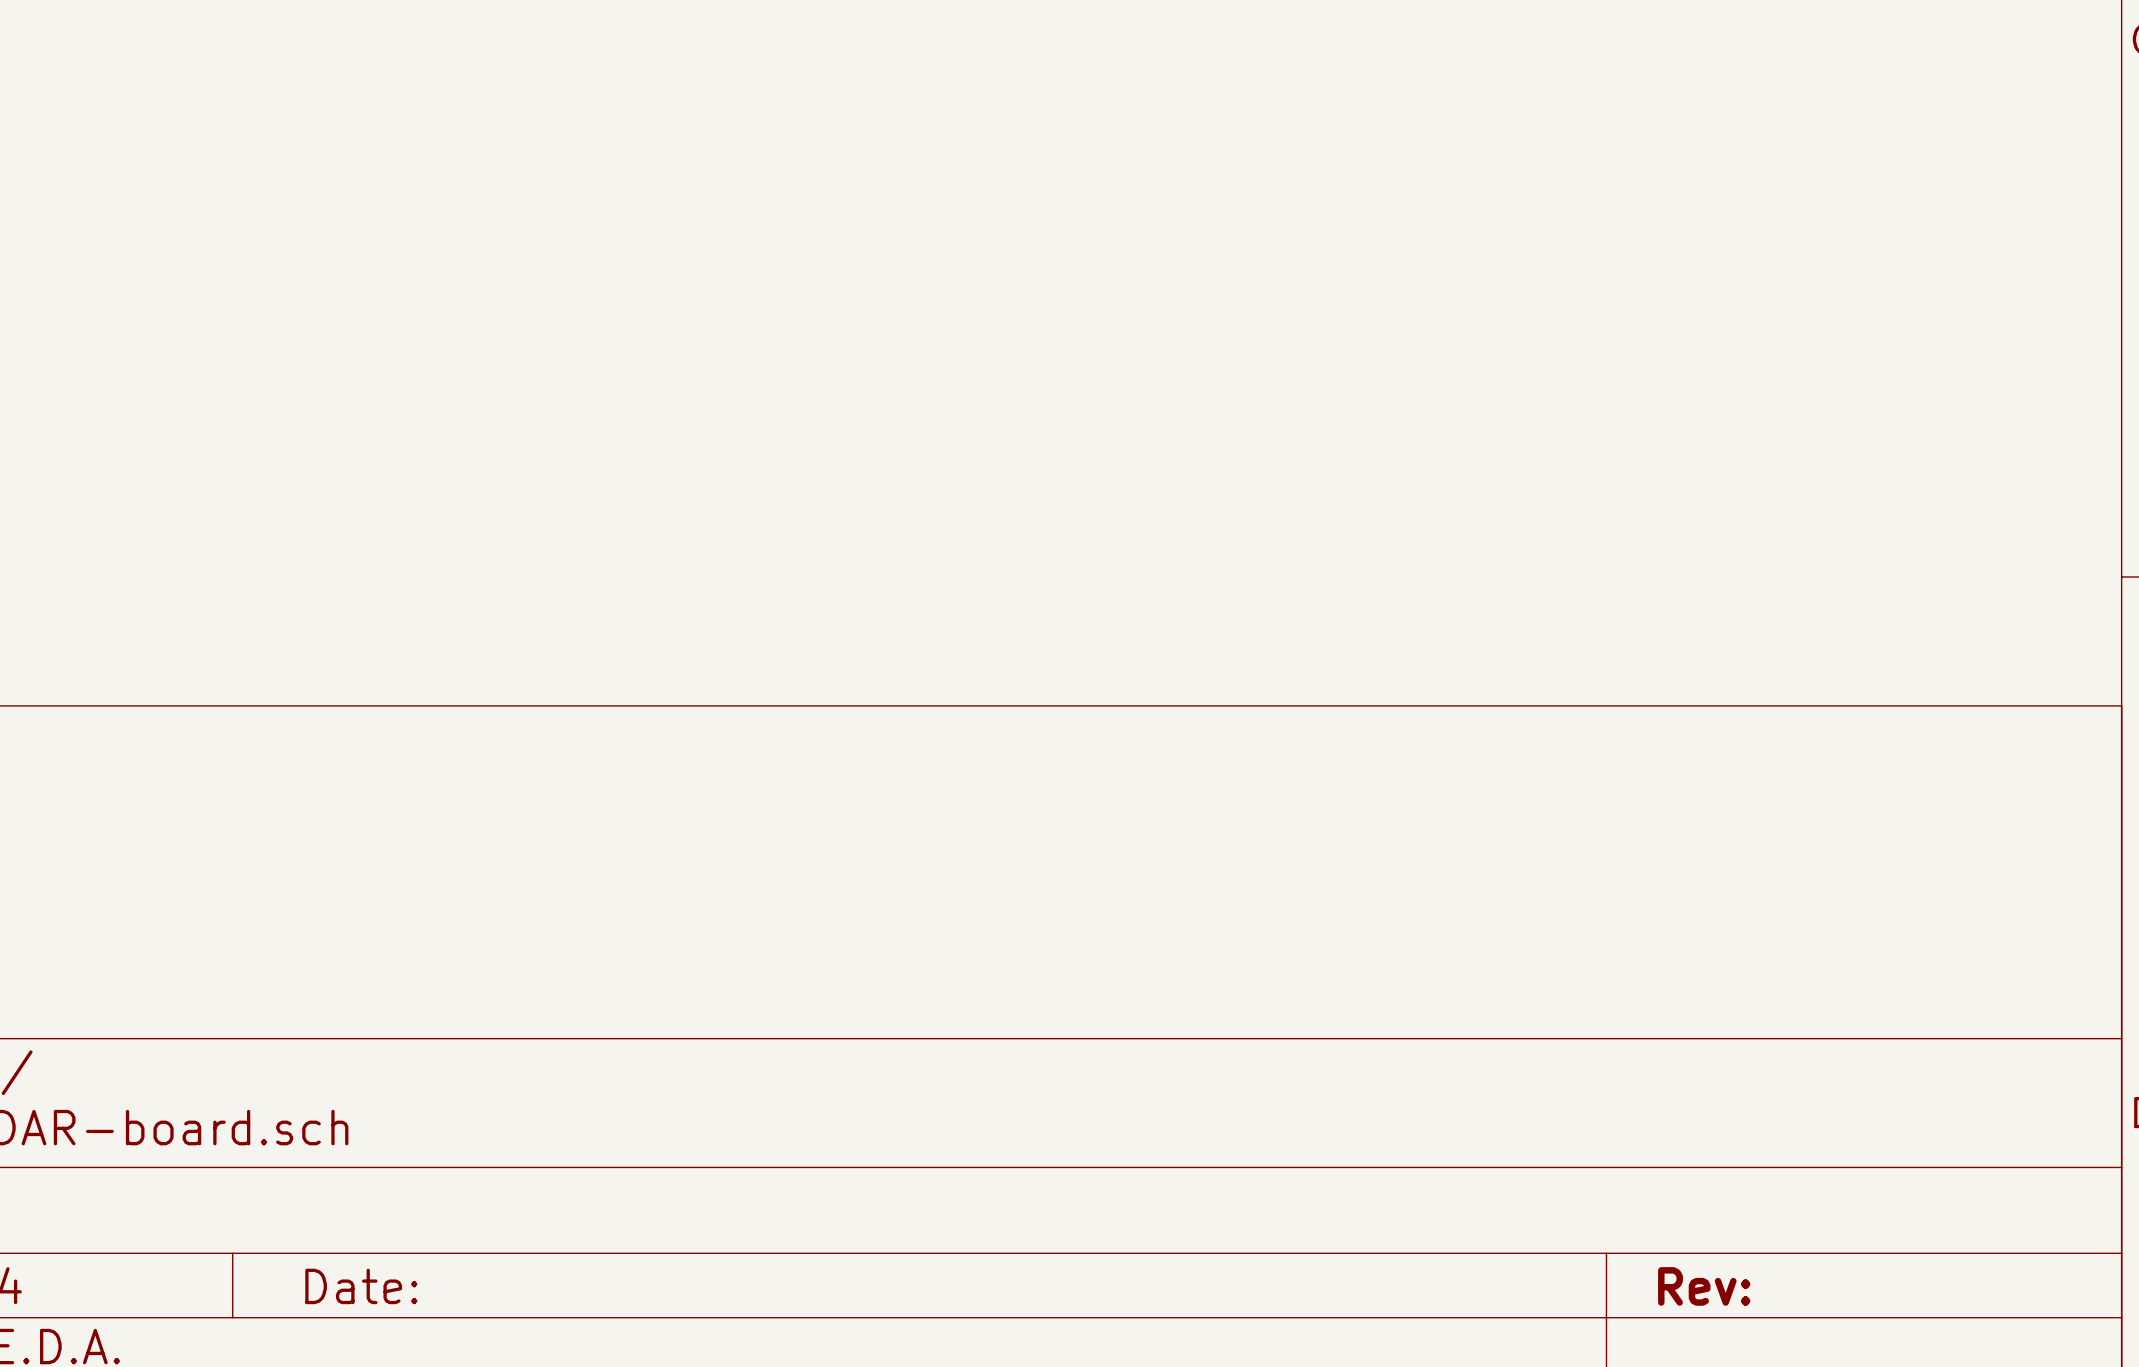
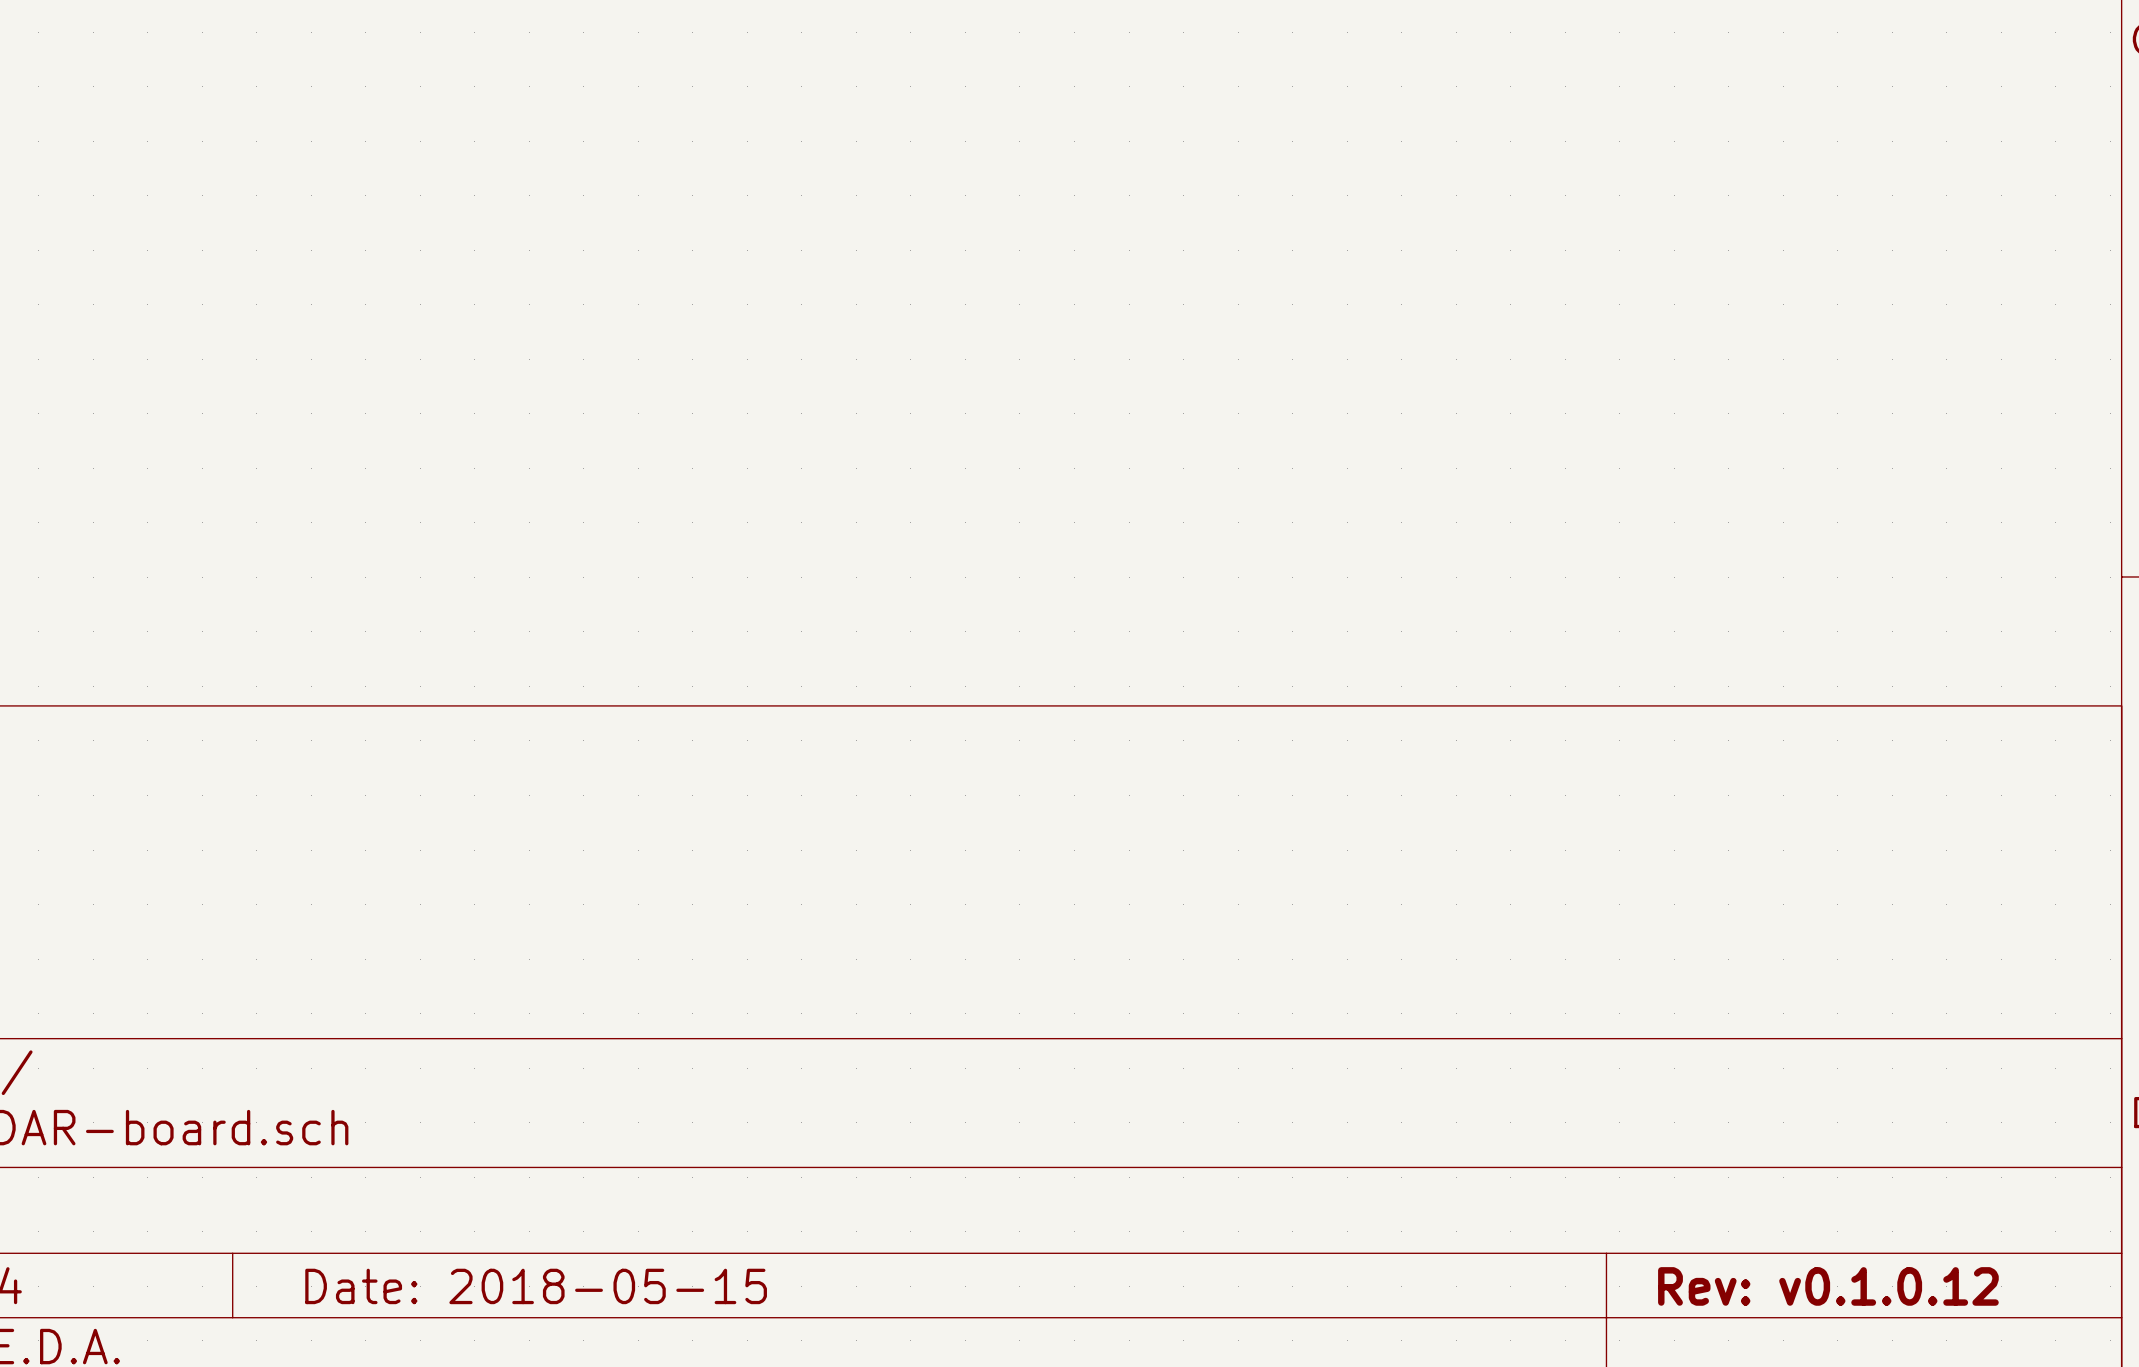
title block: Date: (361, 1286) -> Date: 2018-05-15 (536, 1286)
title block: Rev: (1704, 1286) -> Rev: v0.1.0.12 (1828, 1286)

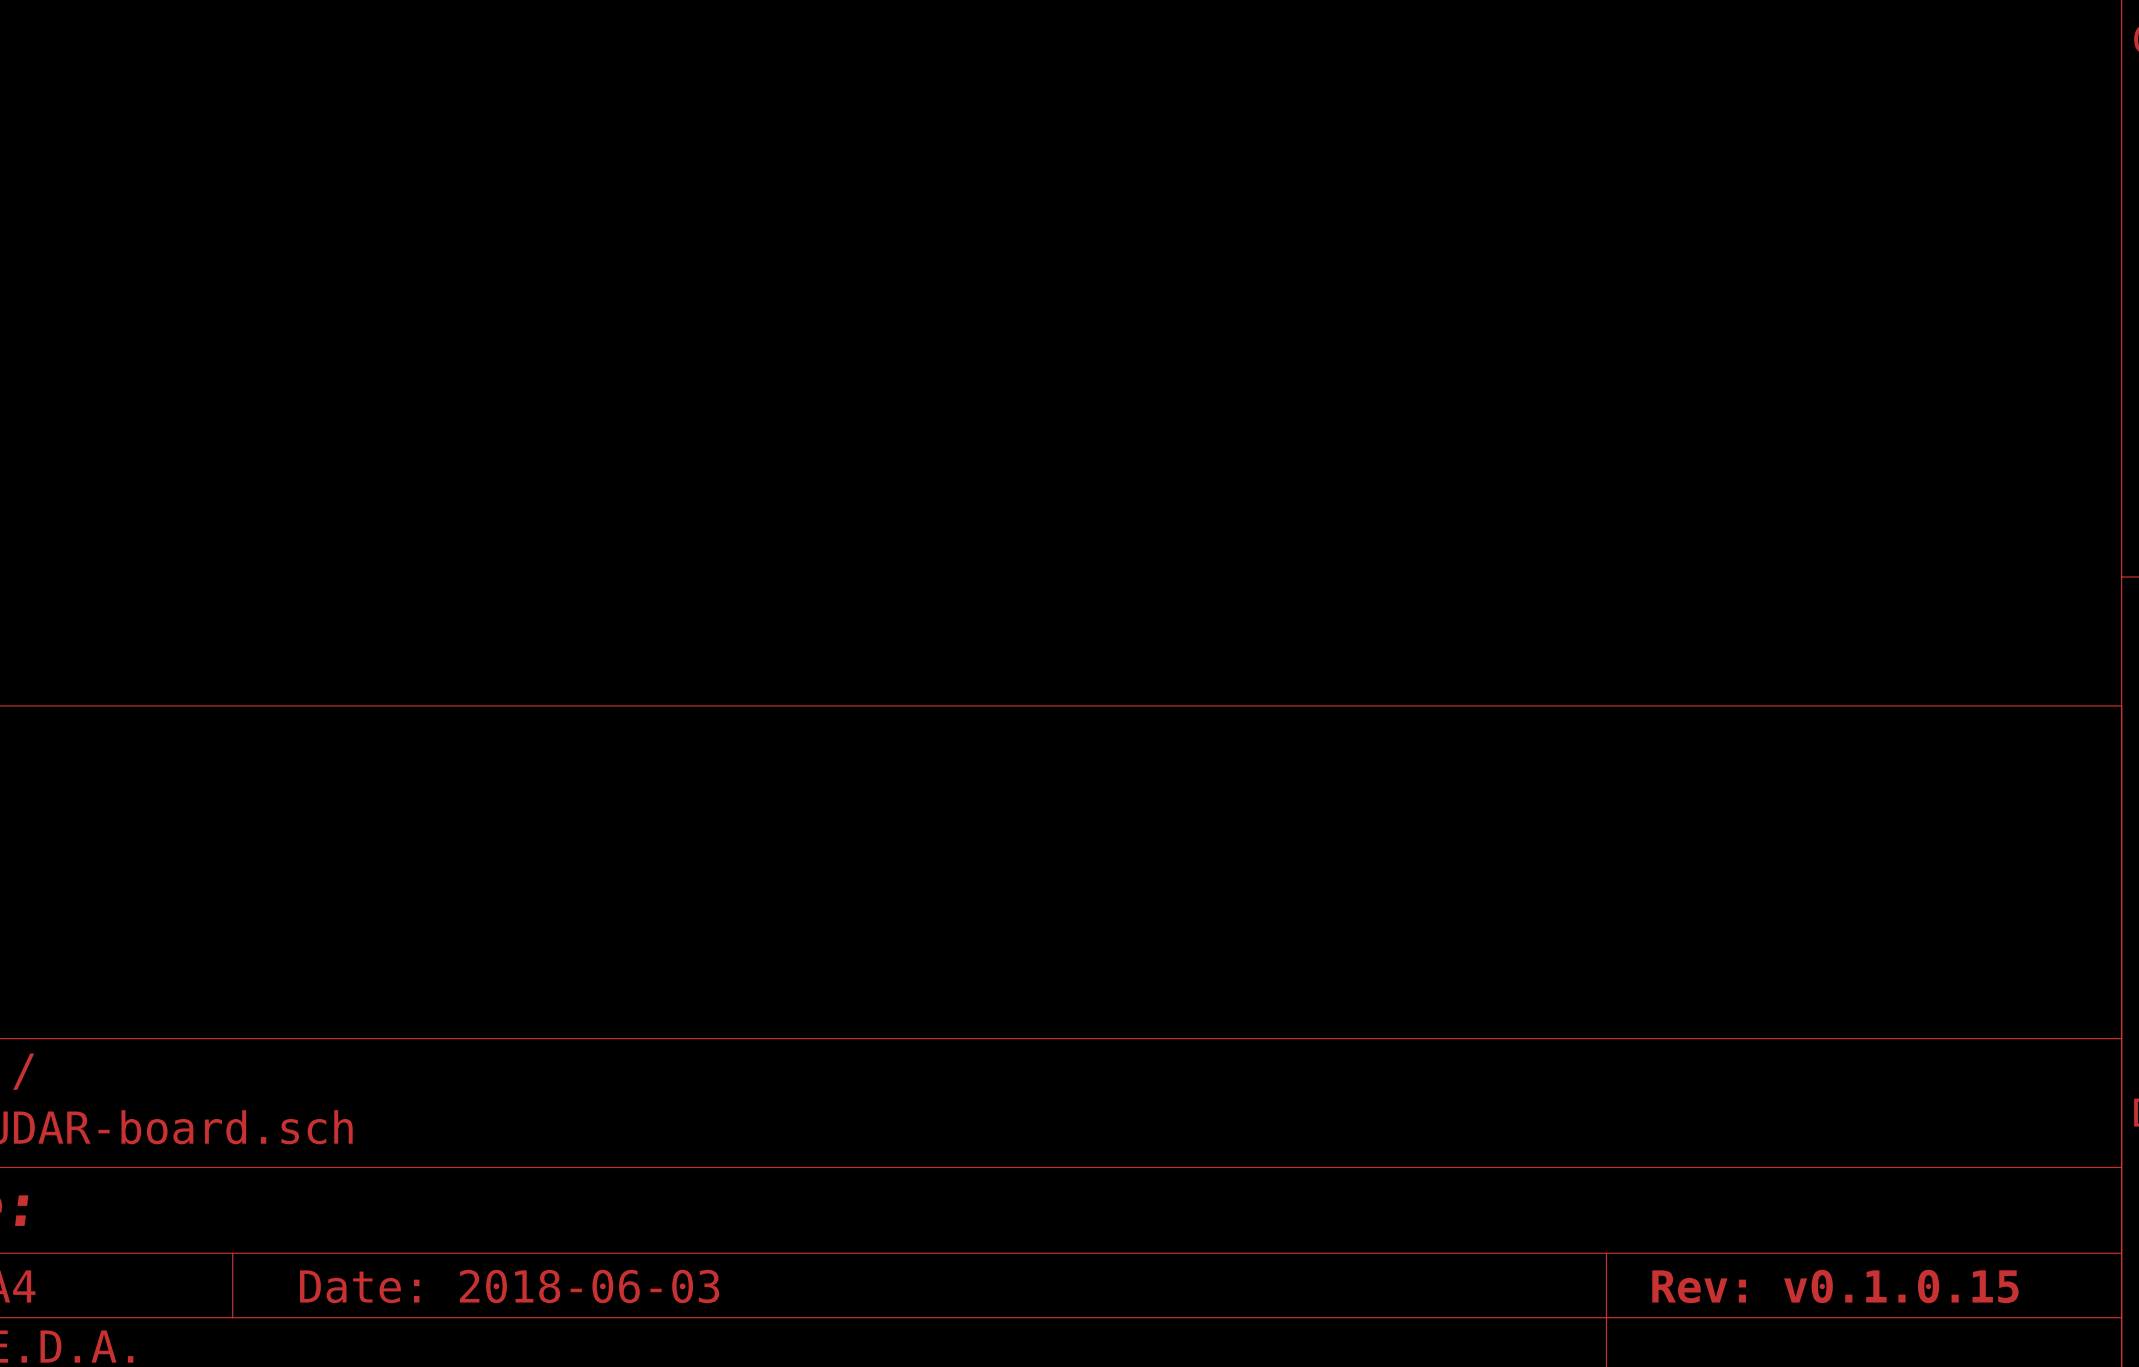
title block: Date: 2018-05-15 (536, 1286) -> Date: 2018-06-03 (509, 1286)
title block: Rev: v0.1.0.12 (1828, 1286) -> Rev: v0.1.0.15 (1835, 1286)

